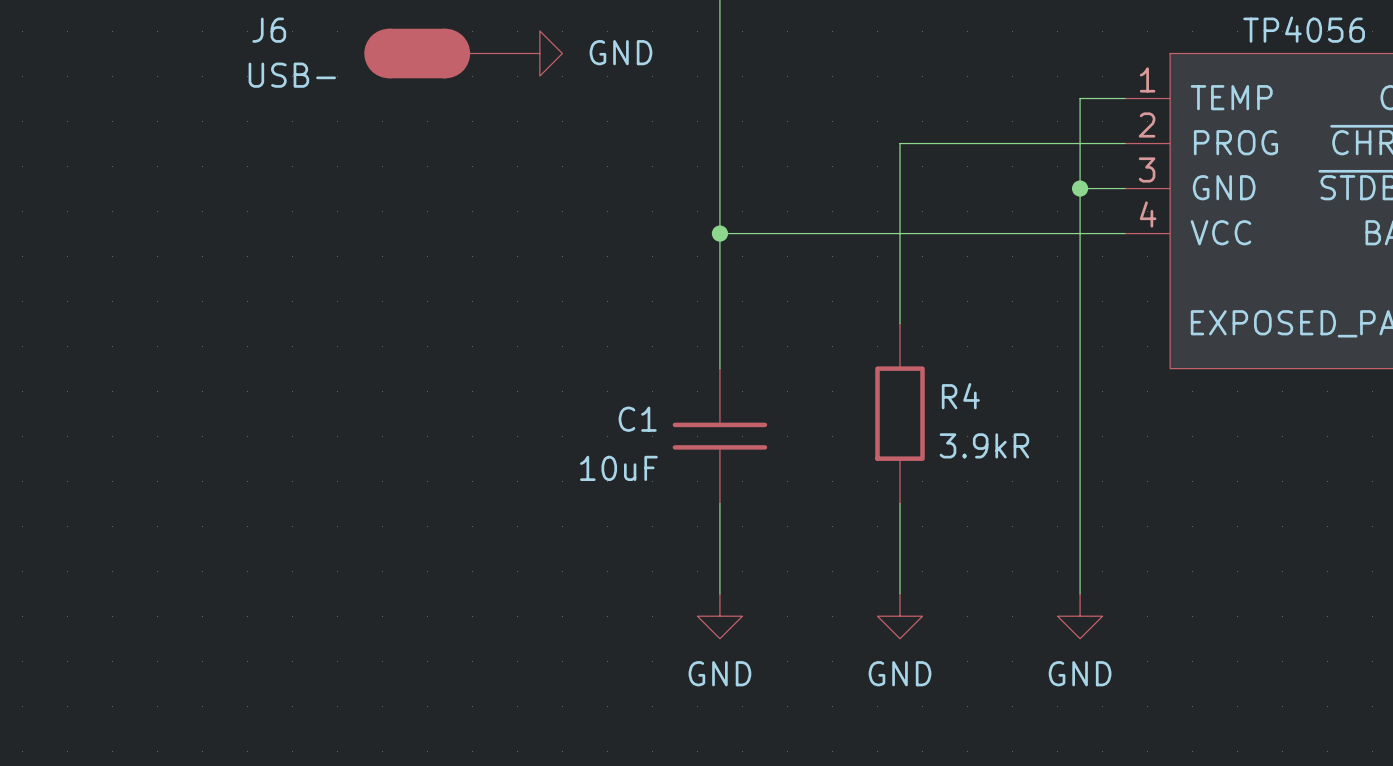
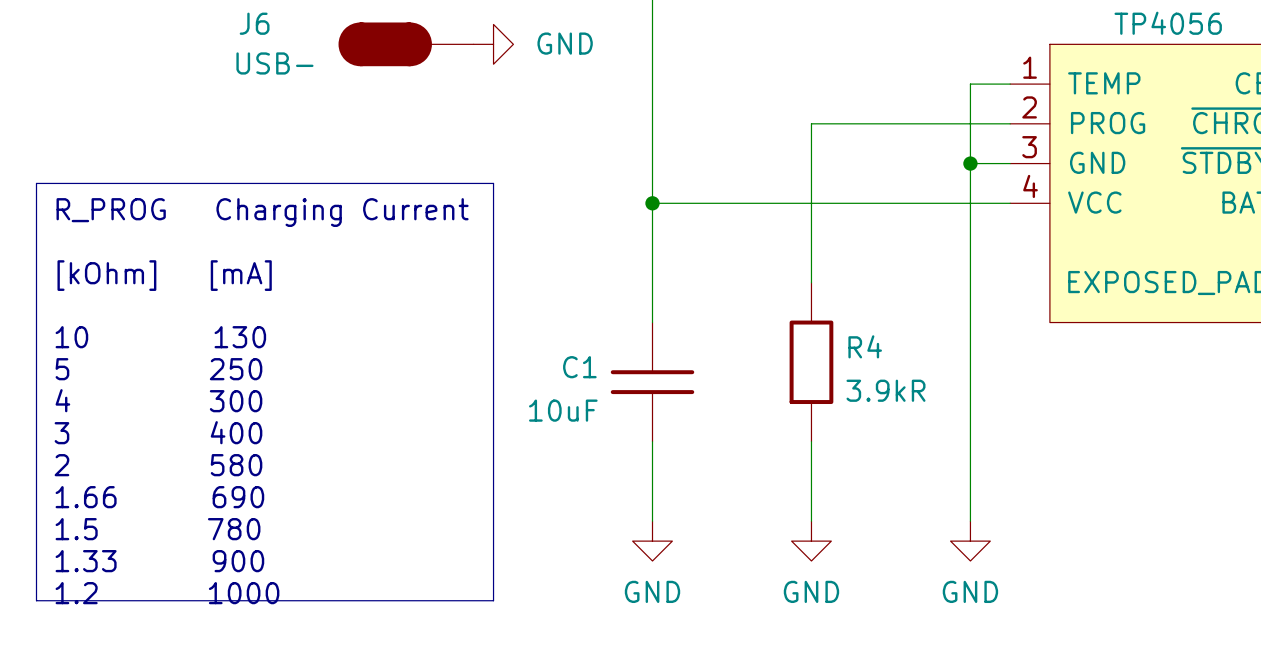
line: none -> (36, 183) (493, 183) (493, 600) (36, 600) (36, 183)
text: none -> R_PROG Charging Current (262, 212)
text: none -> [kOhm] [mA] (164, 275)
text: none -> 10 130 (160, 337)
text: none -> 5 250 (158, 369)
text: none -> 4 300 (158, 400)
text: none -> 3 400 (158, 432)
text: none -> 2 580 (158, 465)
text: none -> 1.66 690 (159, 497)
text: none -> 1.5 780 (158, 529)
text: none -> 1.33 900 (159, 561)
text: none -> 1.2 1000 (167, 593)

